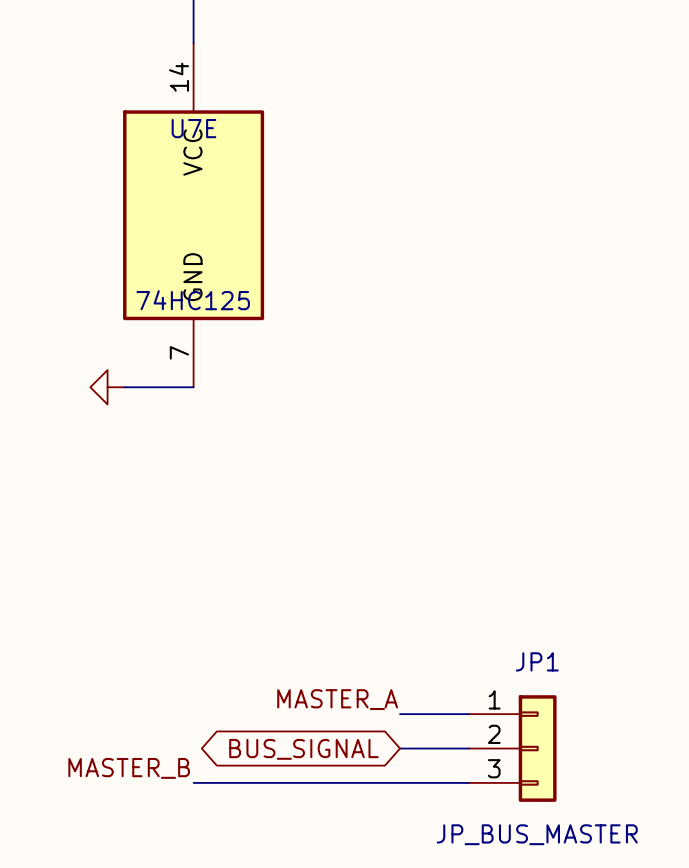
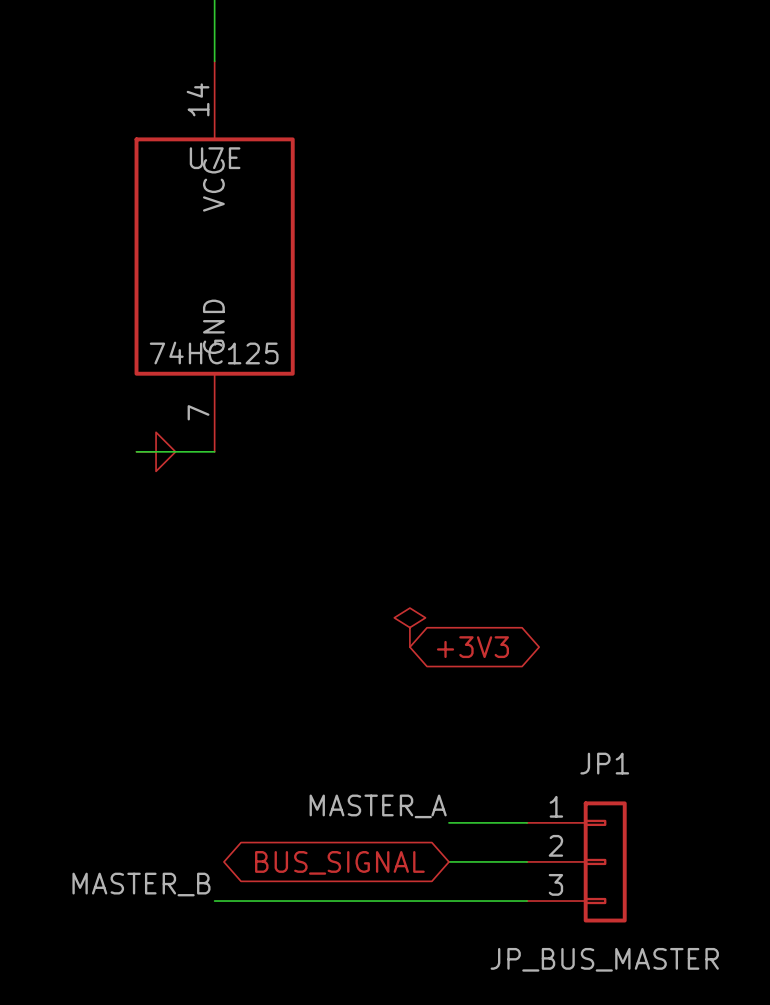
power symbol rotation: 0° (107, 387) -> 180° (156, 451)
power symbol position: (107, 387) -> (156, 451)
power symbol: none -> (409, 627)
global label: none -> +3V3 (472, 647)

